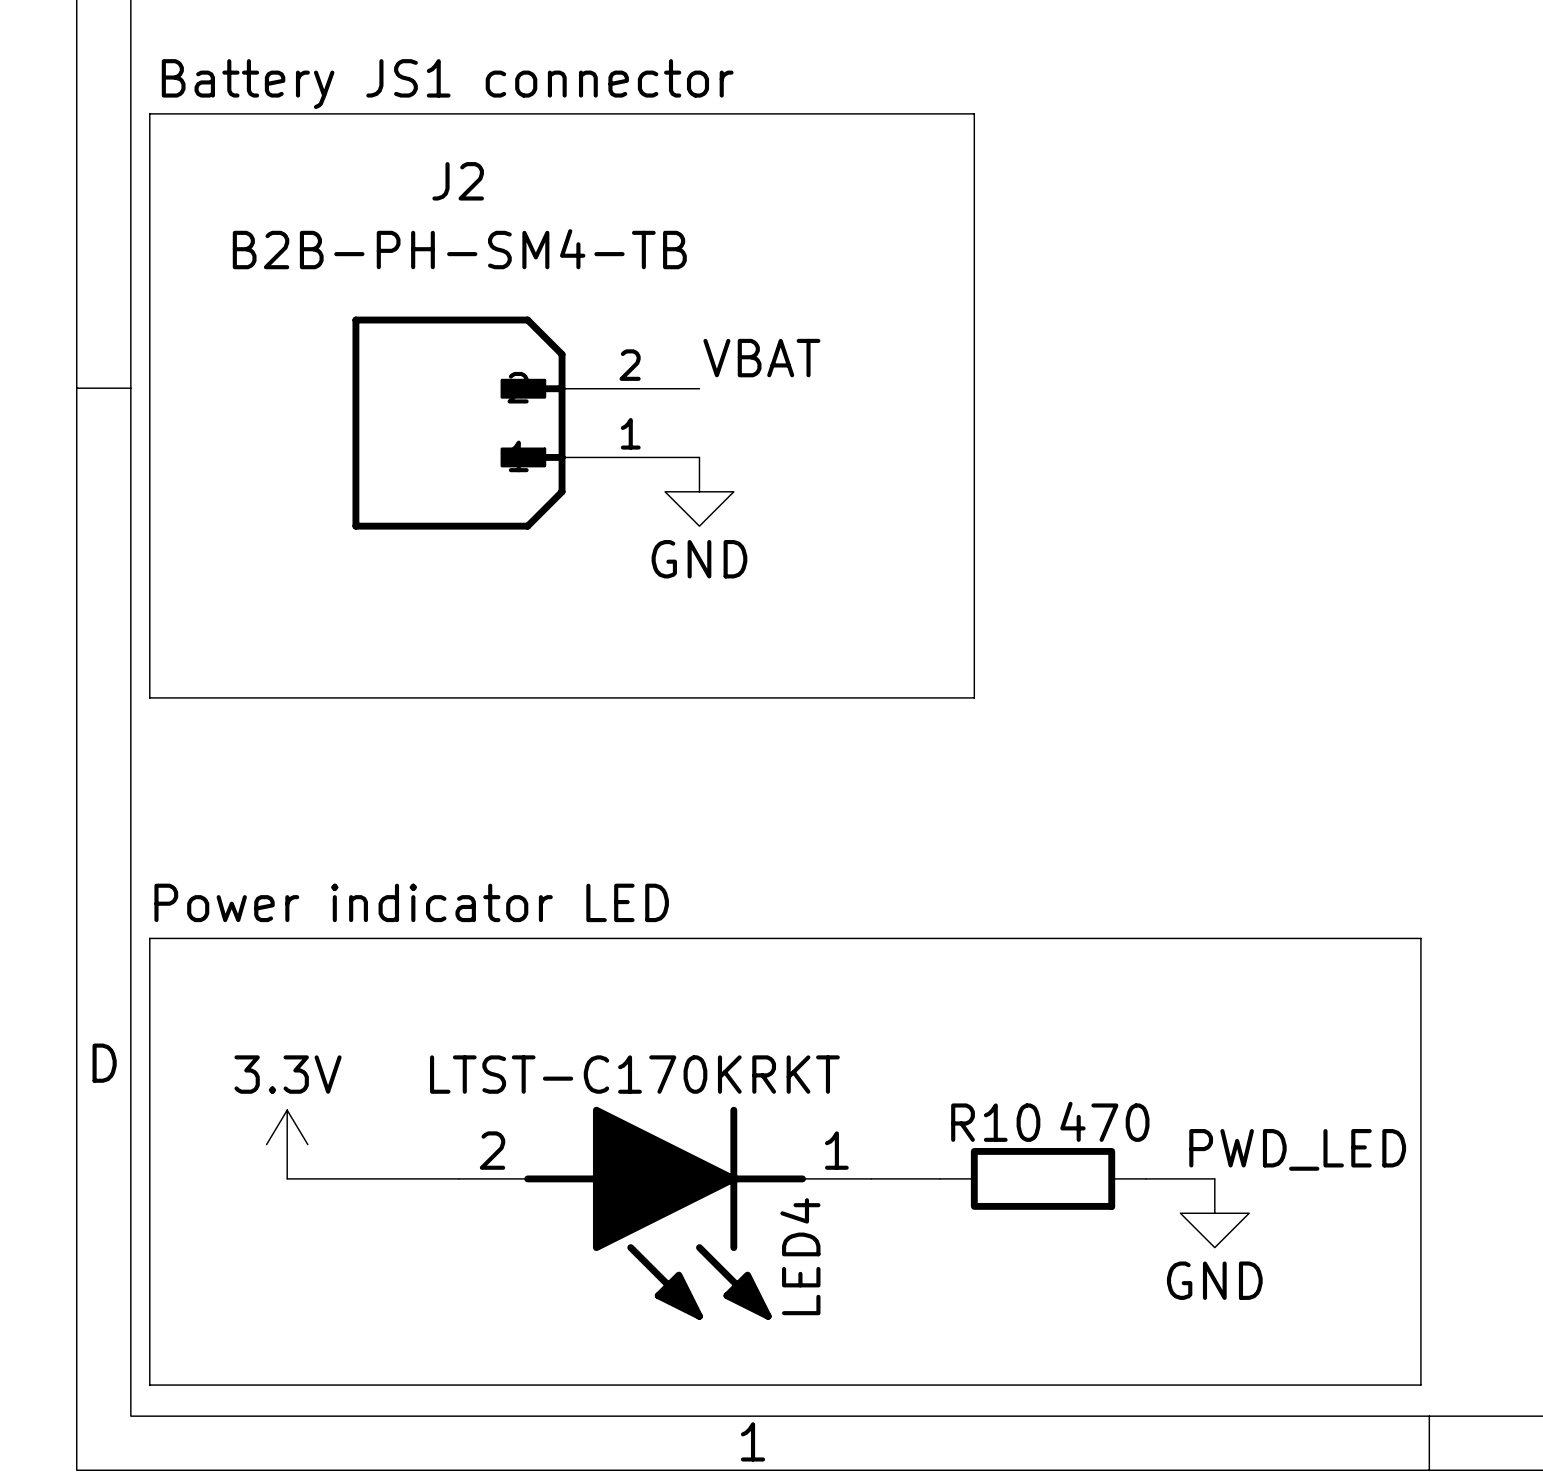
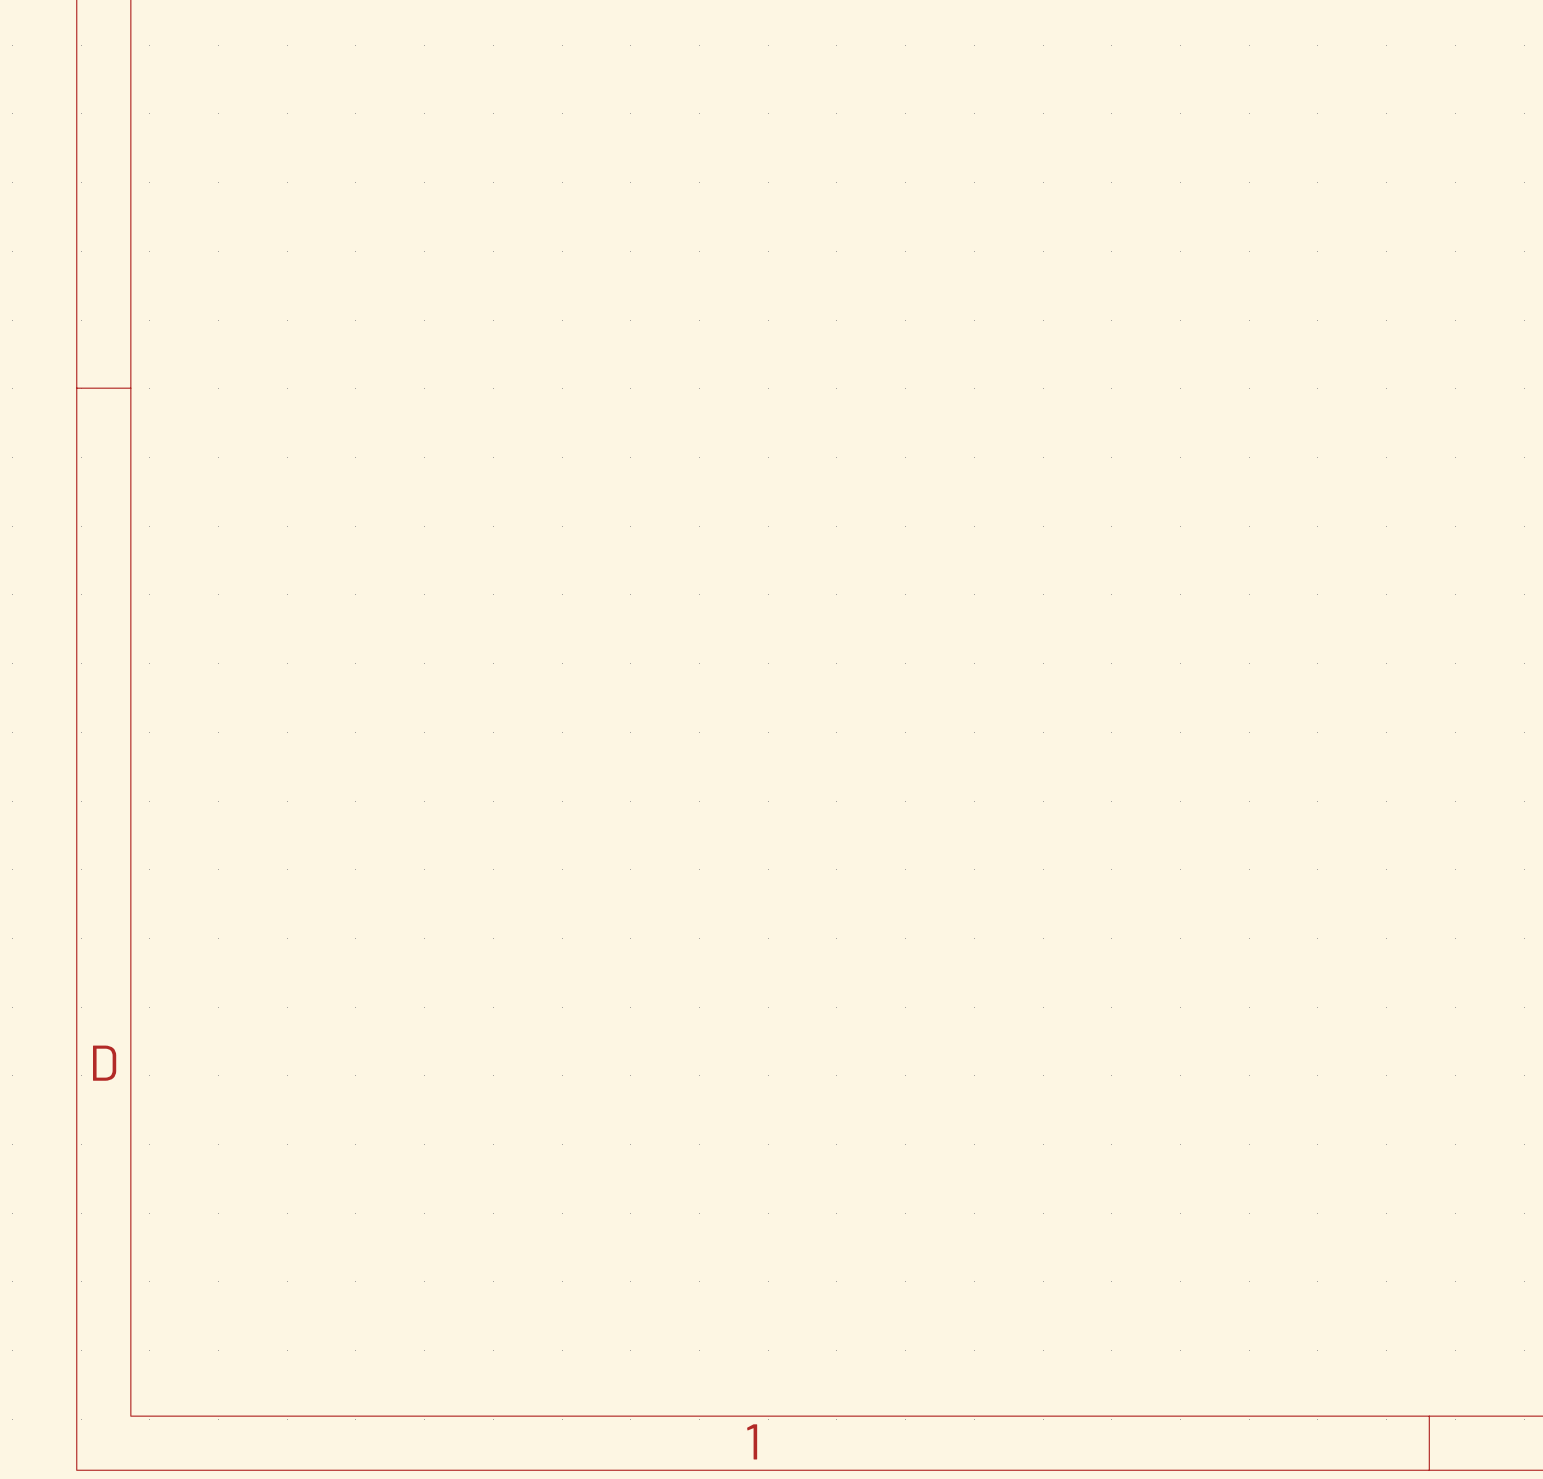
text: Battery JS1 connector (447, 84) -> none
line: (149, 113) (974, 113) (974, 697) (149, 697) (149, 113) -> none
label: VBAT (761, 358) -> none
J2: B2B-PH-SM4-TB (525, 423) -> none
power symbol: GND (699, 491) -> none
text: Power indicator LED (411, 902) -> none
line: (149, 938) (149, 1385) (1420, 1385) (1420, 938) (149, 938) -> none
power symbol: 3.3V (287, 1144) -> none
label: PWD_LED (1297, 1149) -> none
wire: (287, 1178) (458, 1178) -> none
wire: (871, 1178) (939, 1178) -> none
R10: 470 (1043, 1178) -> none
wire: (1146, 1178) (1214, 1178) -> none
LED4: LTST-C170KRKT (665, 1213) -> none
power symbol: GND (1214, 1213) -> none

